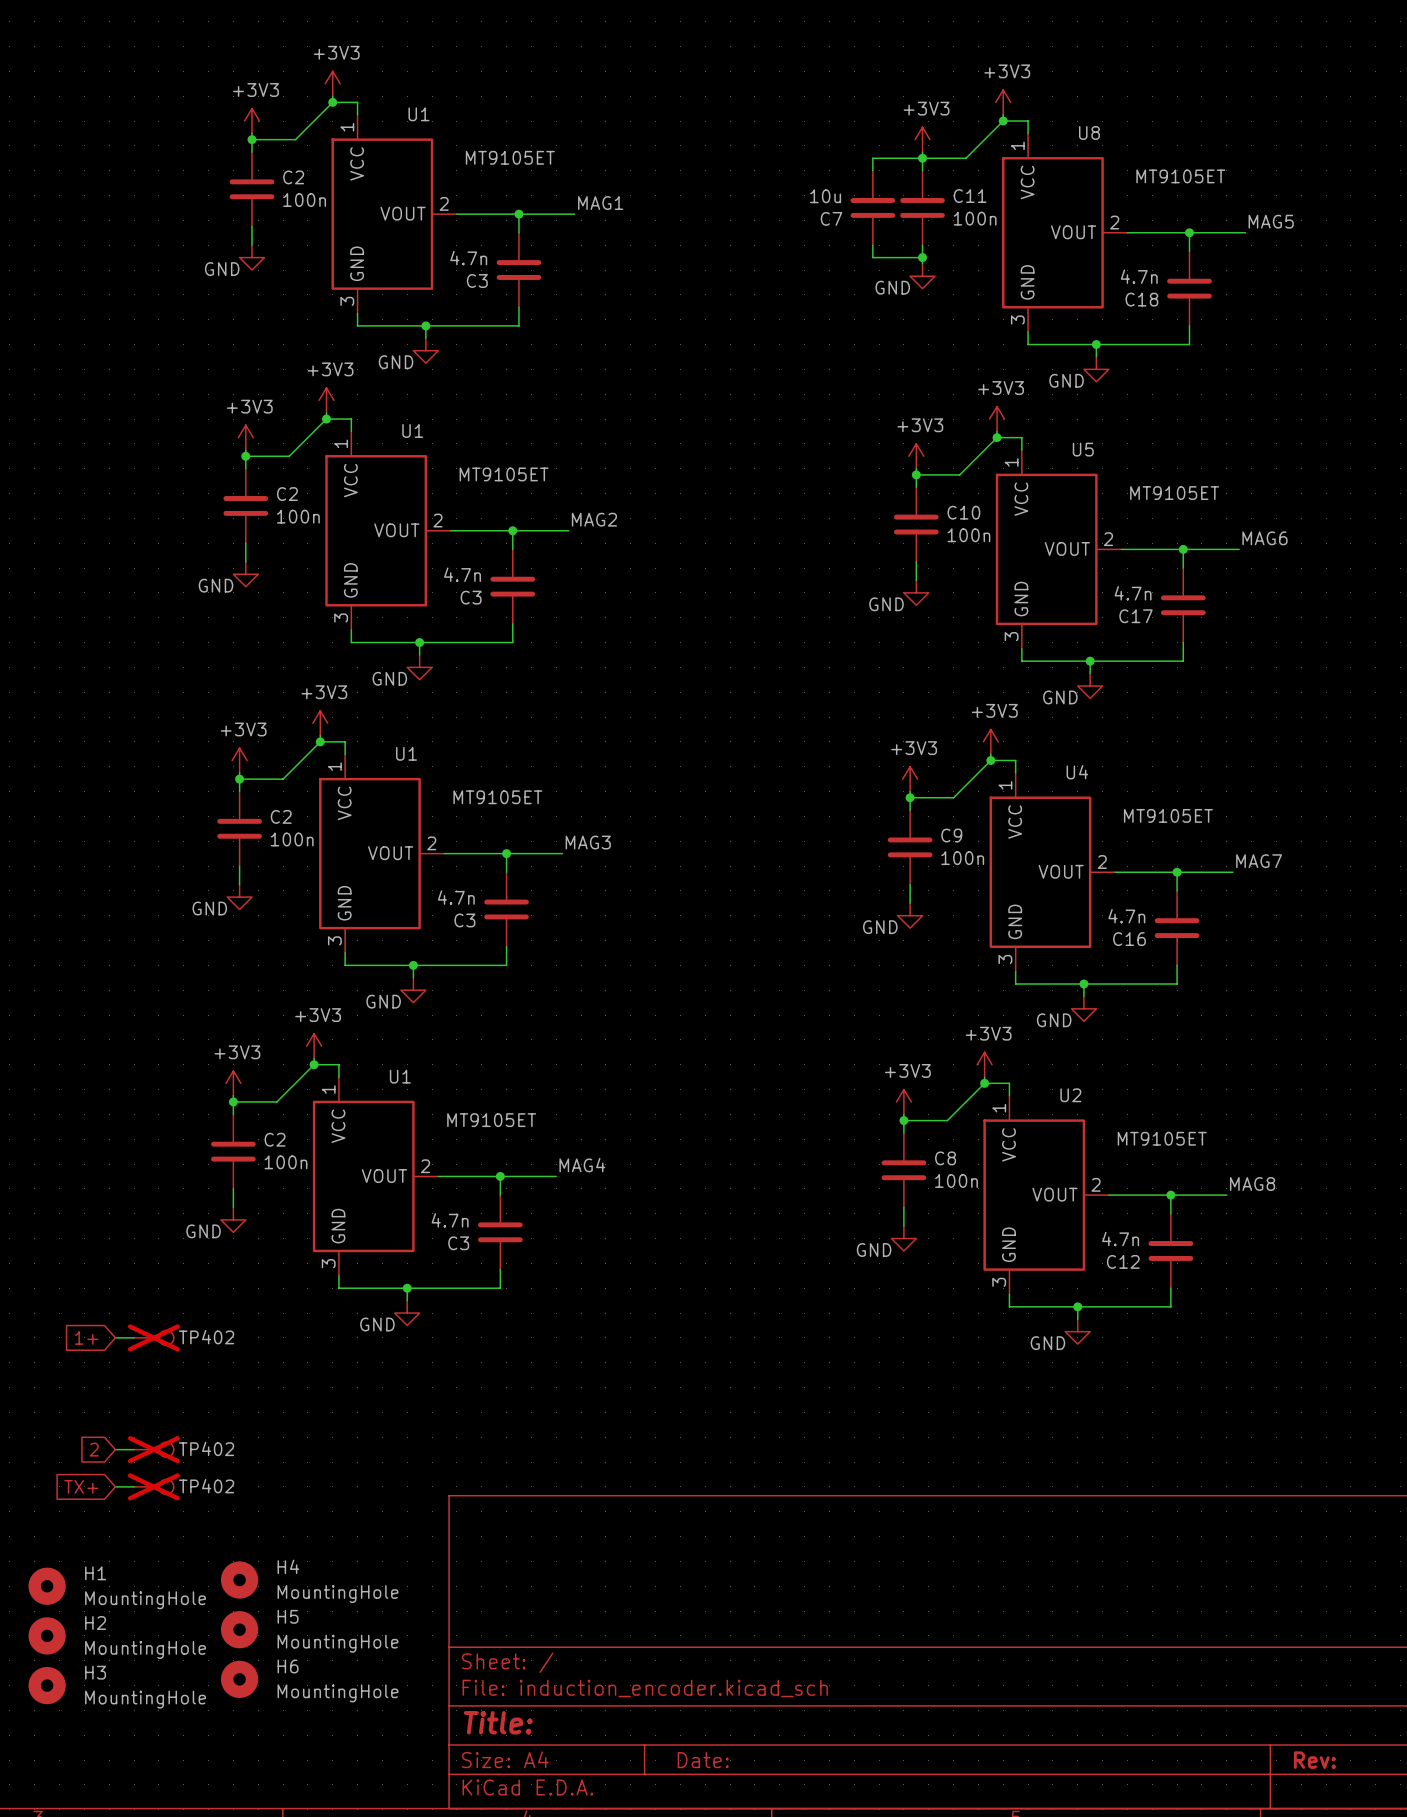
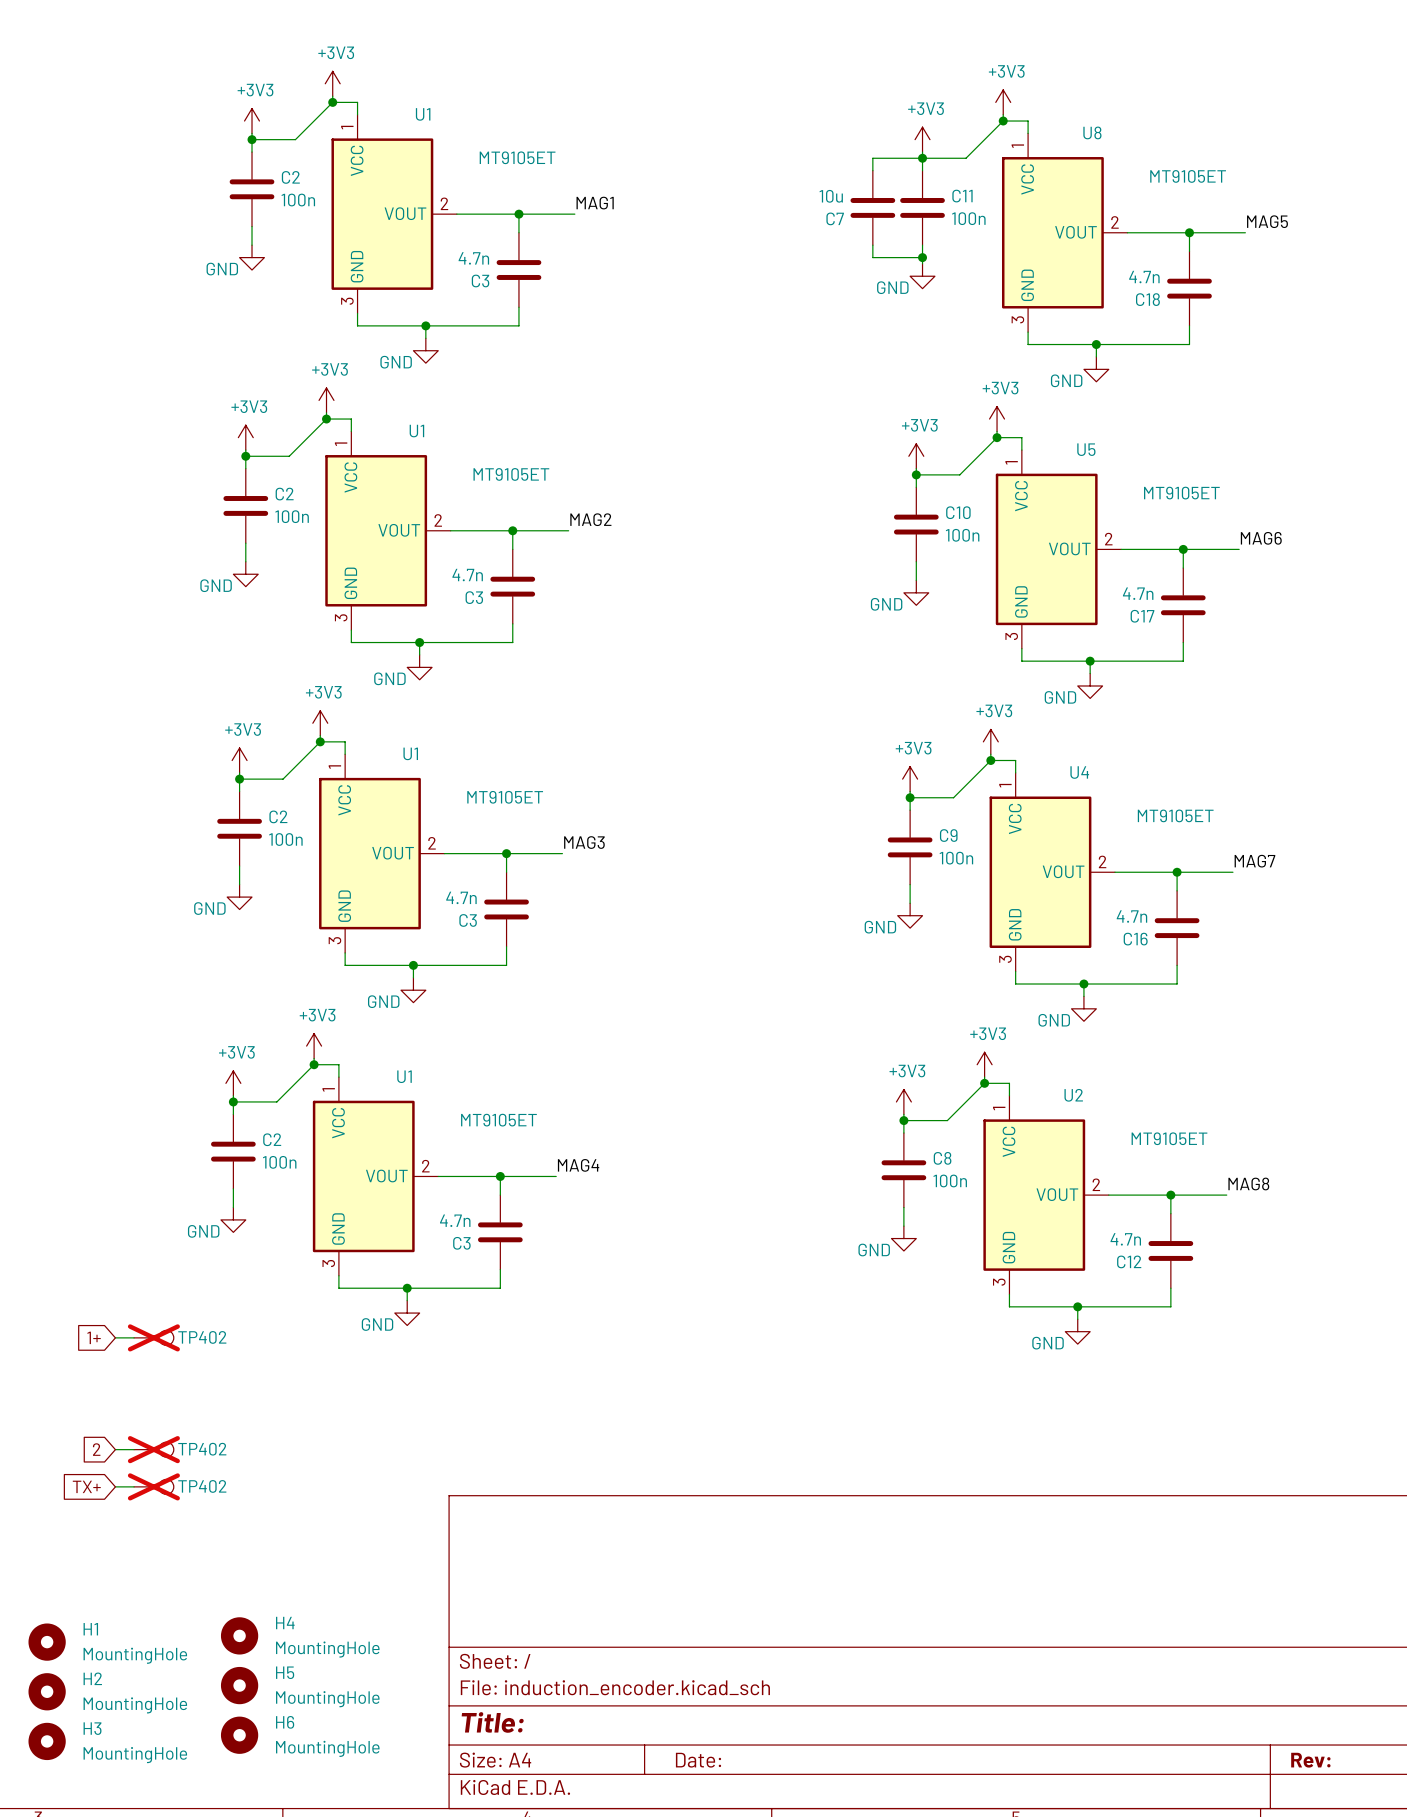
H4 position: (239, 1580) -> (239, 1635)
H1 position: (47, 1586) -> (47, 1642)
H5 position: (239, 1629) -> (239, 1685)
H2 position: (47, 1635) -> (47, 1691)
H6 position: (239, 1679) -> (239, 1735)
H3 position: (47, 1685) -> (47, 1741)

